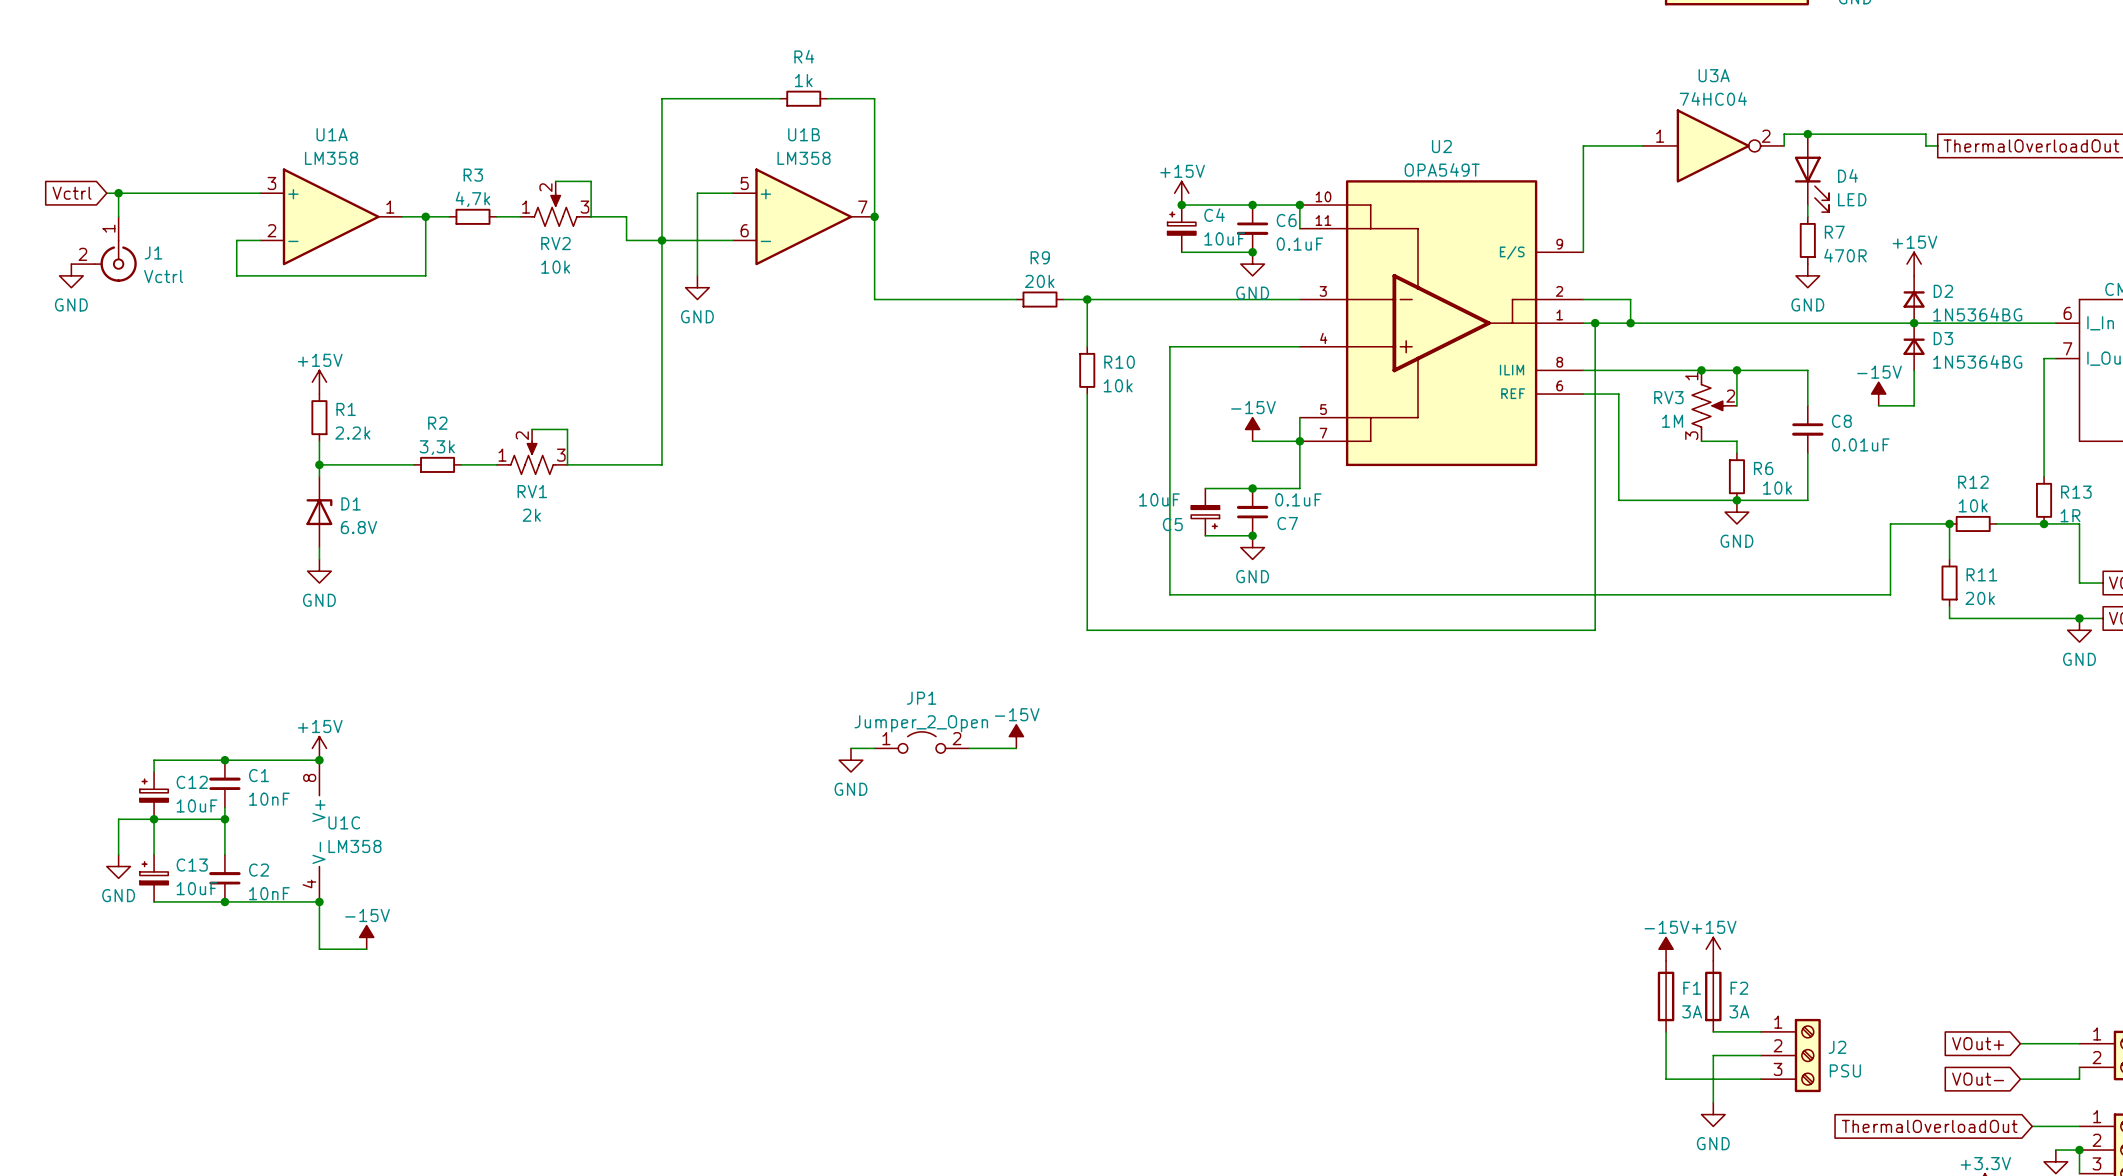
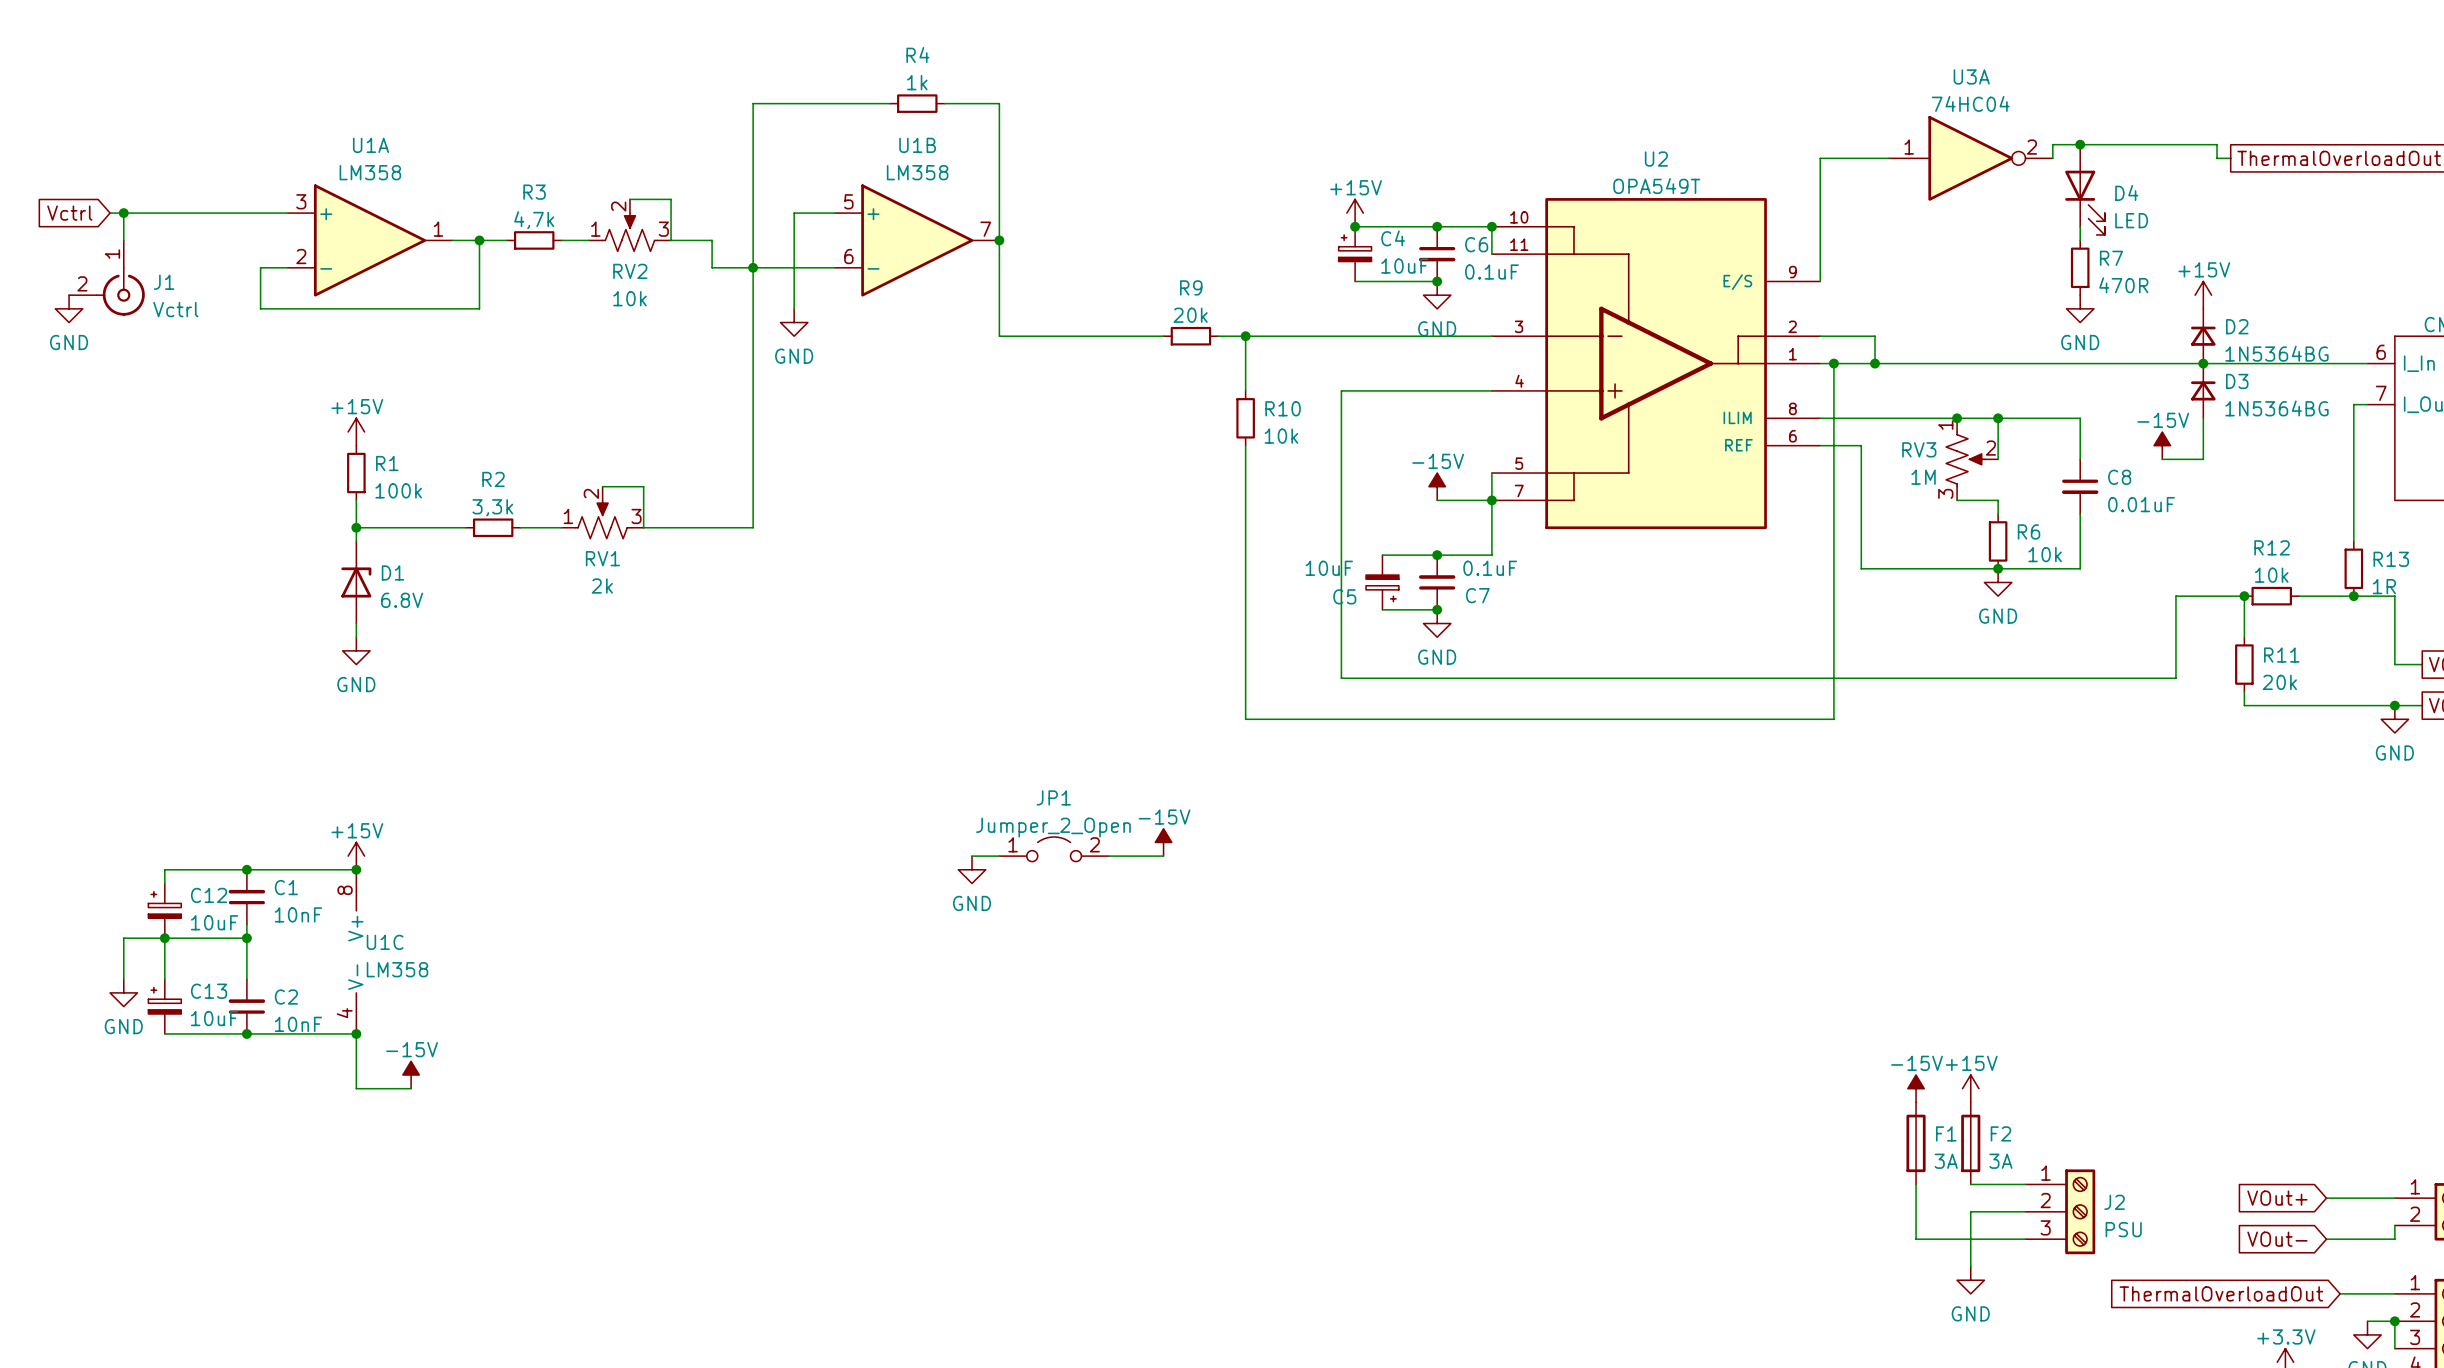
R1 value: 2.2k (352, 433) -> 100k (398, 490)

